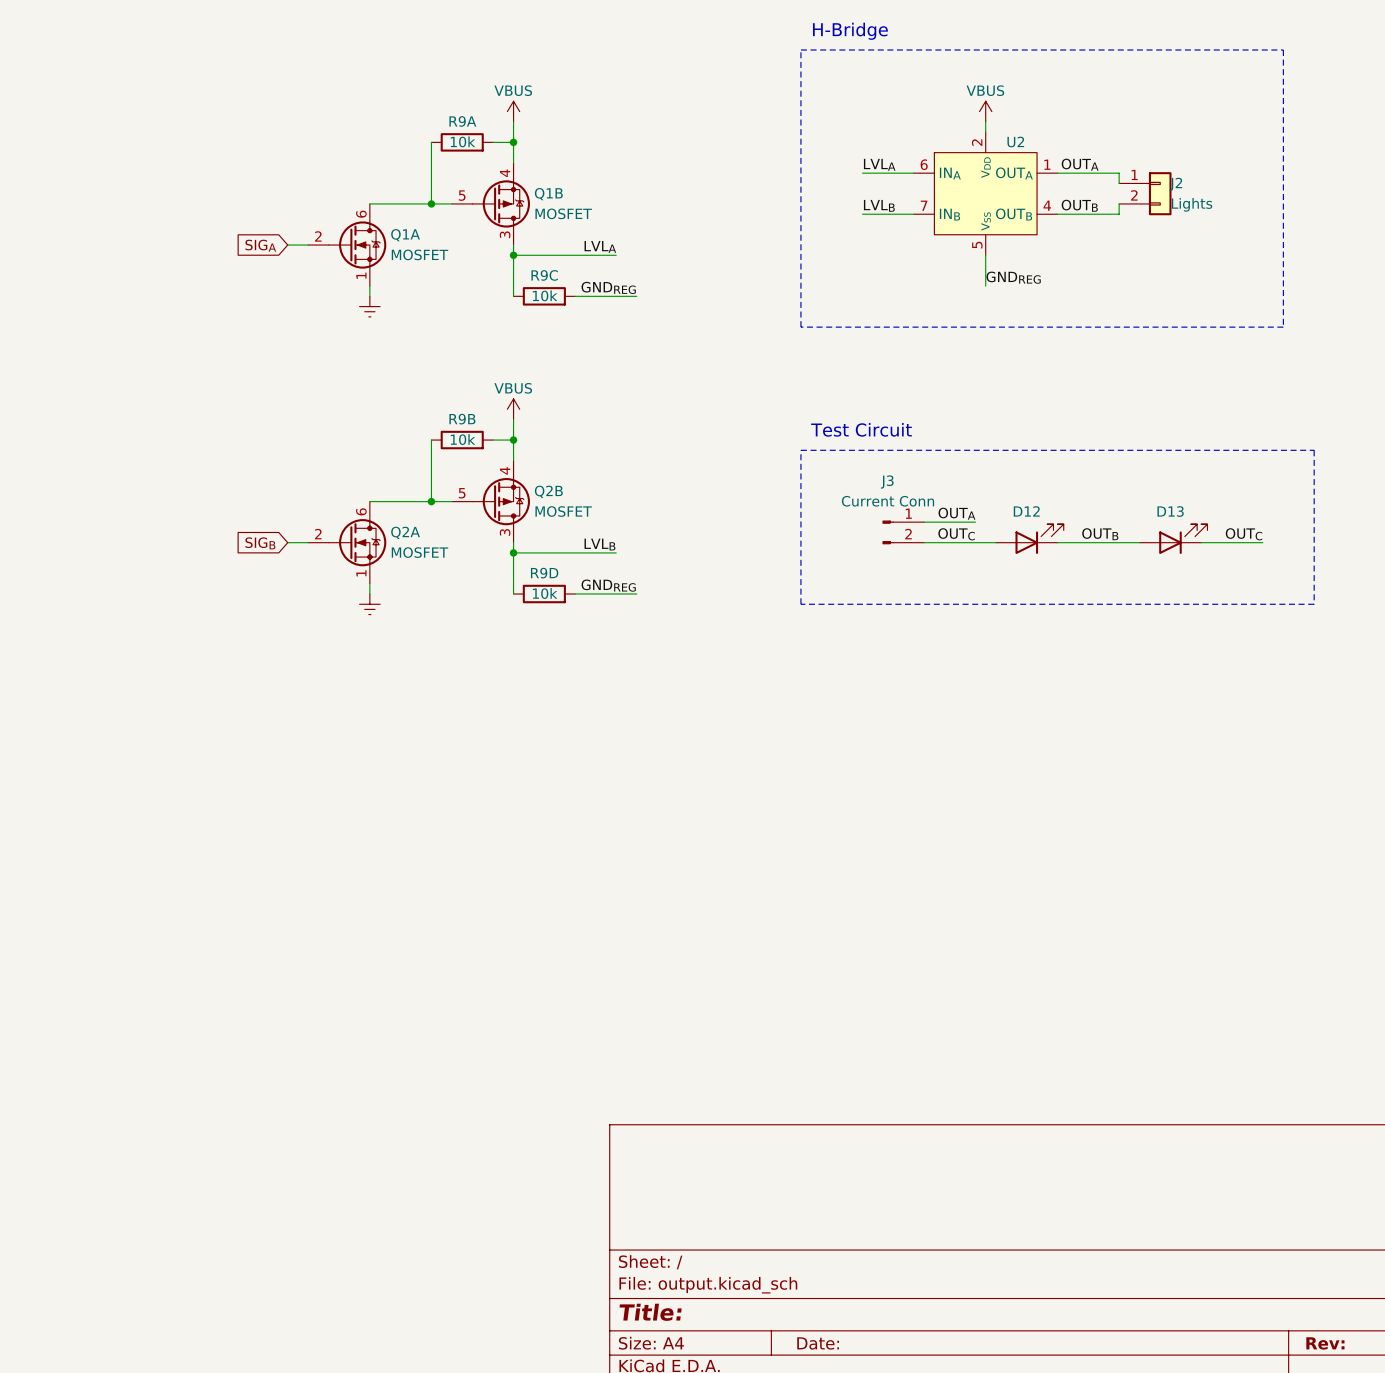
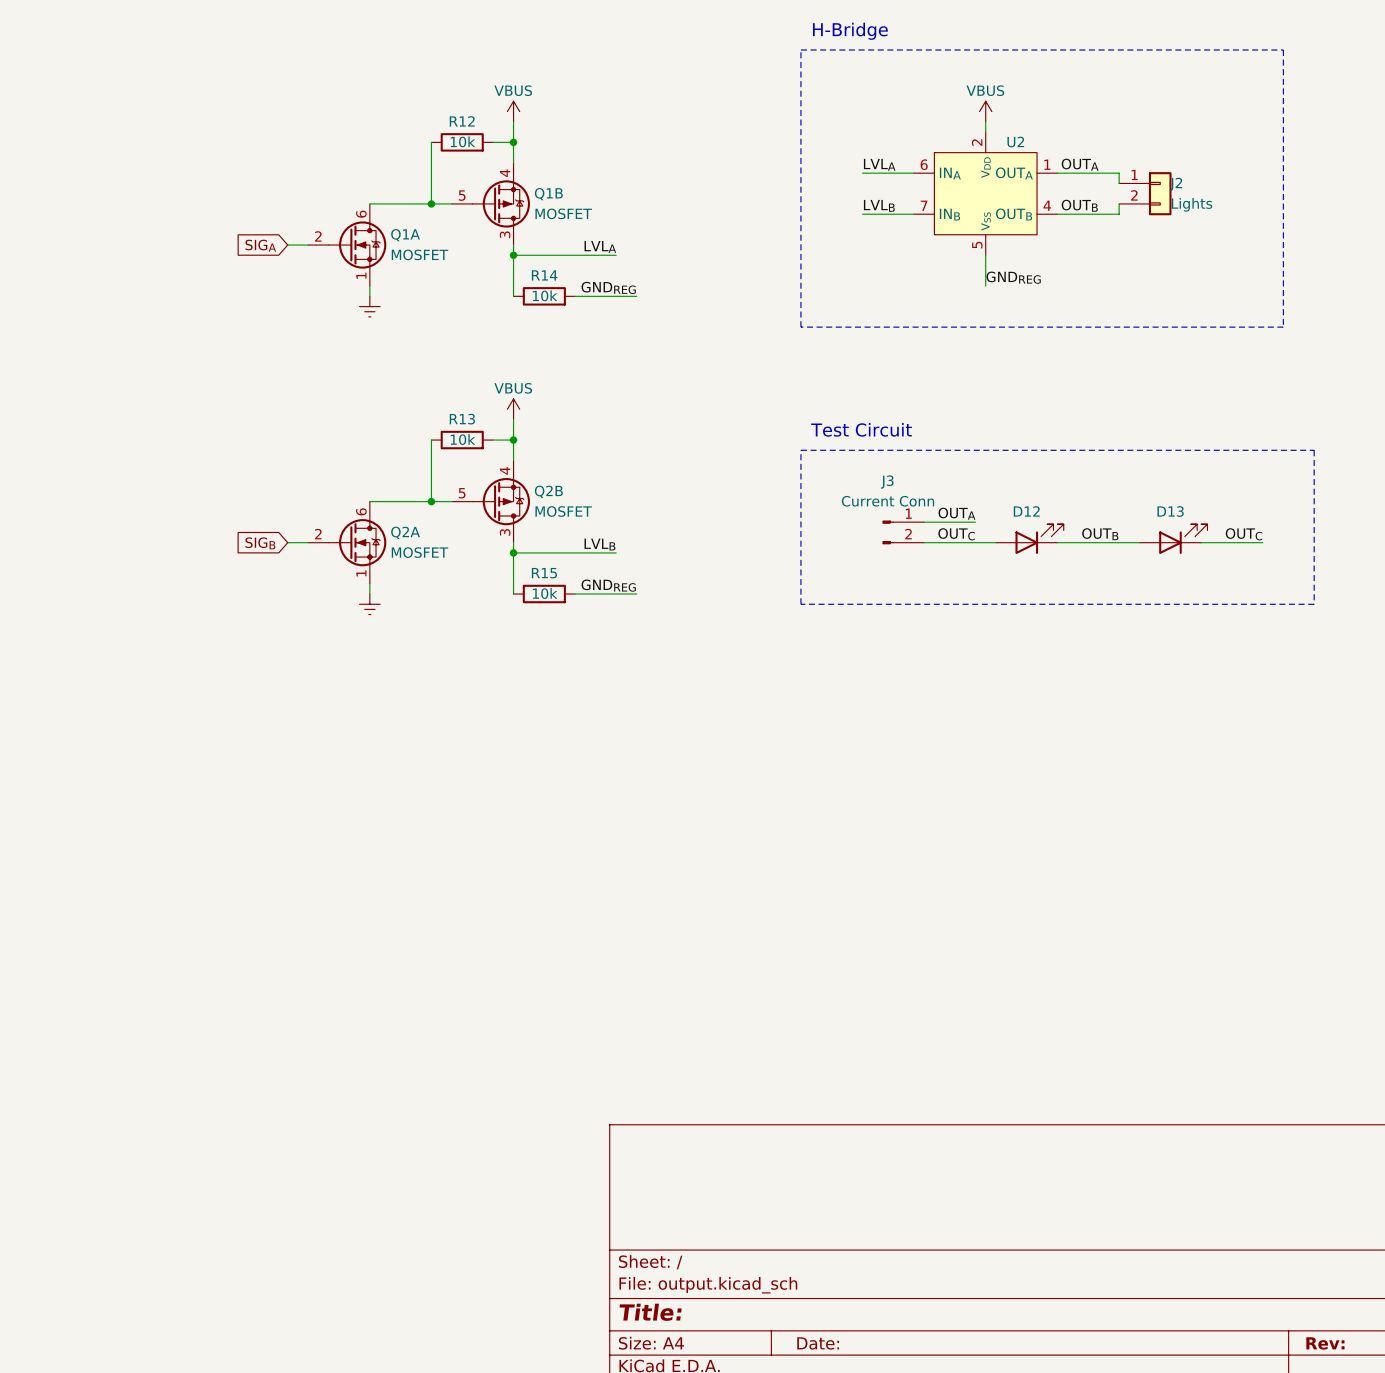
R9A name: R9A (462, 121) -> R12 (462, 121)
R9C name: R9C (544, 275) -> R14 (544, 275)
R9B name: R9B (462, 419) -> R13 (462, 419)
R9D name: R9D (544, 573) -> R15 (544, 573)

